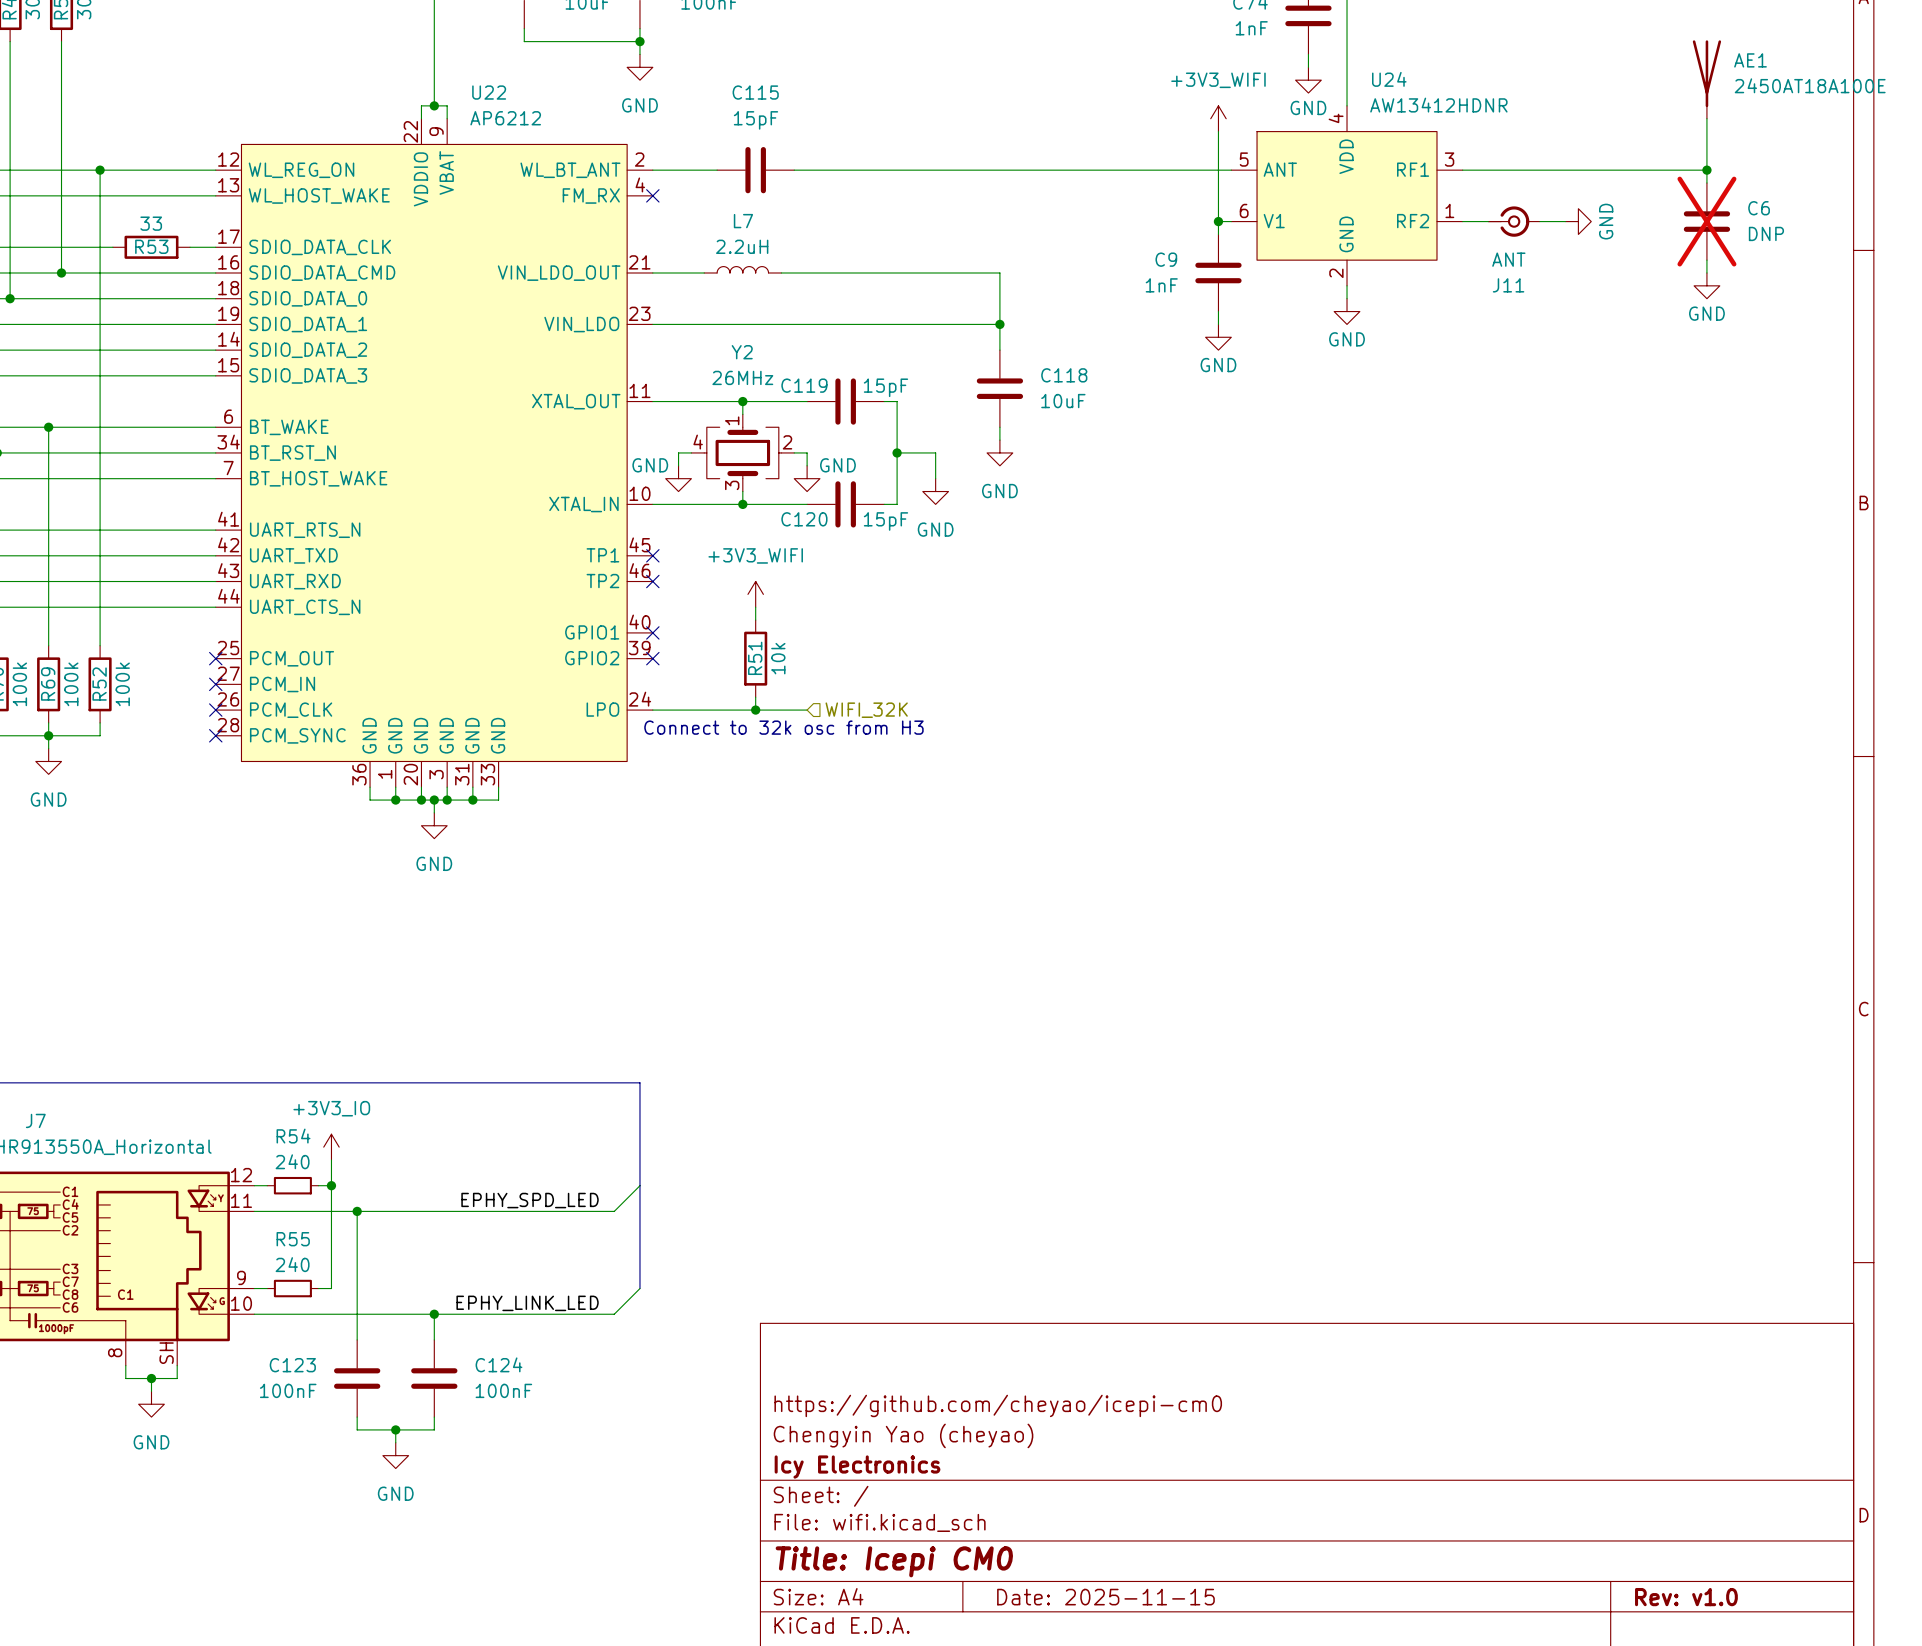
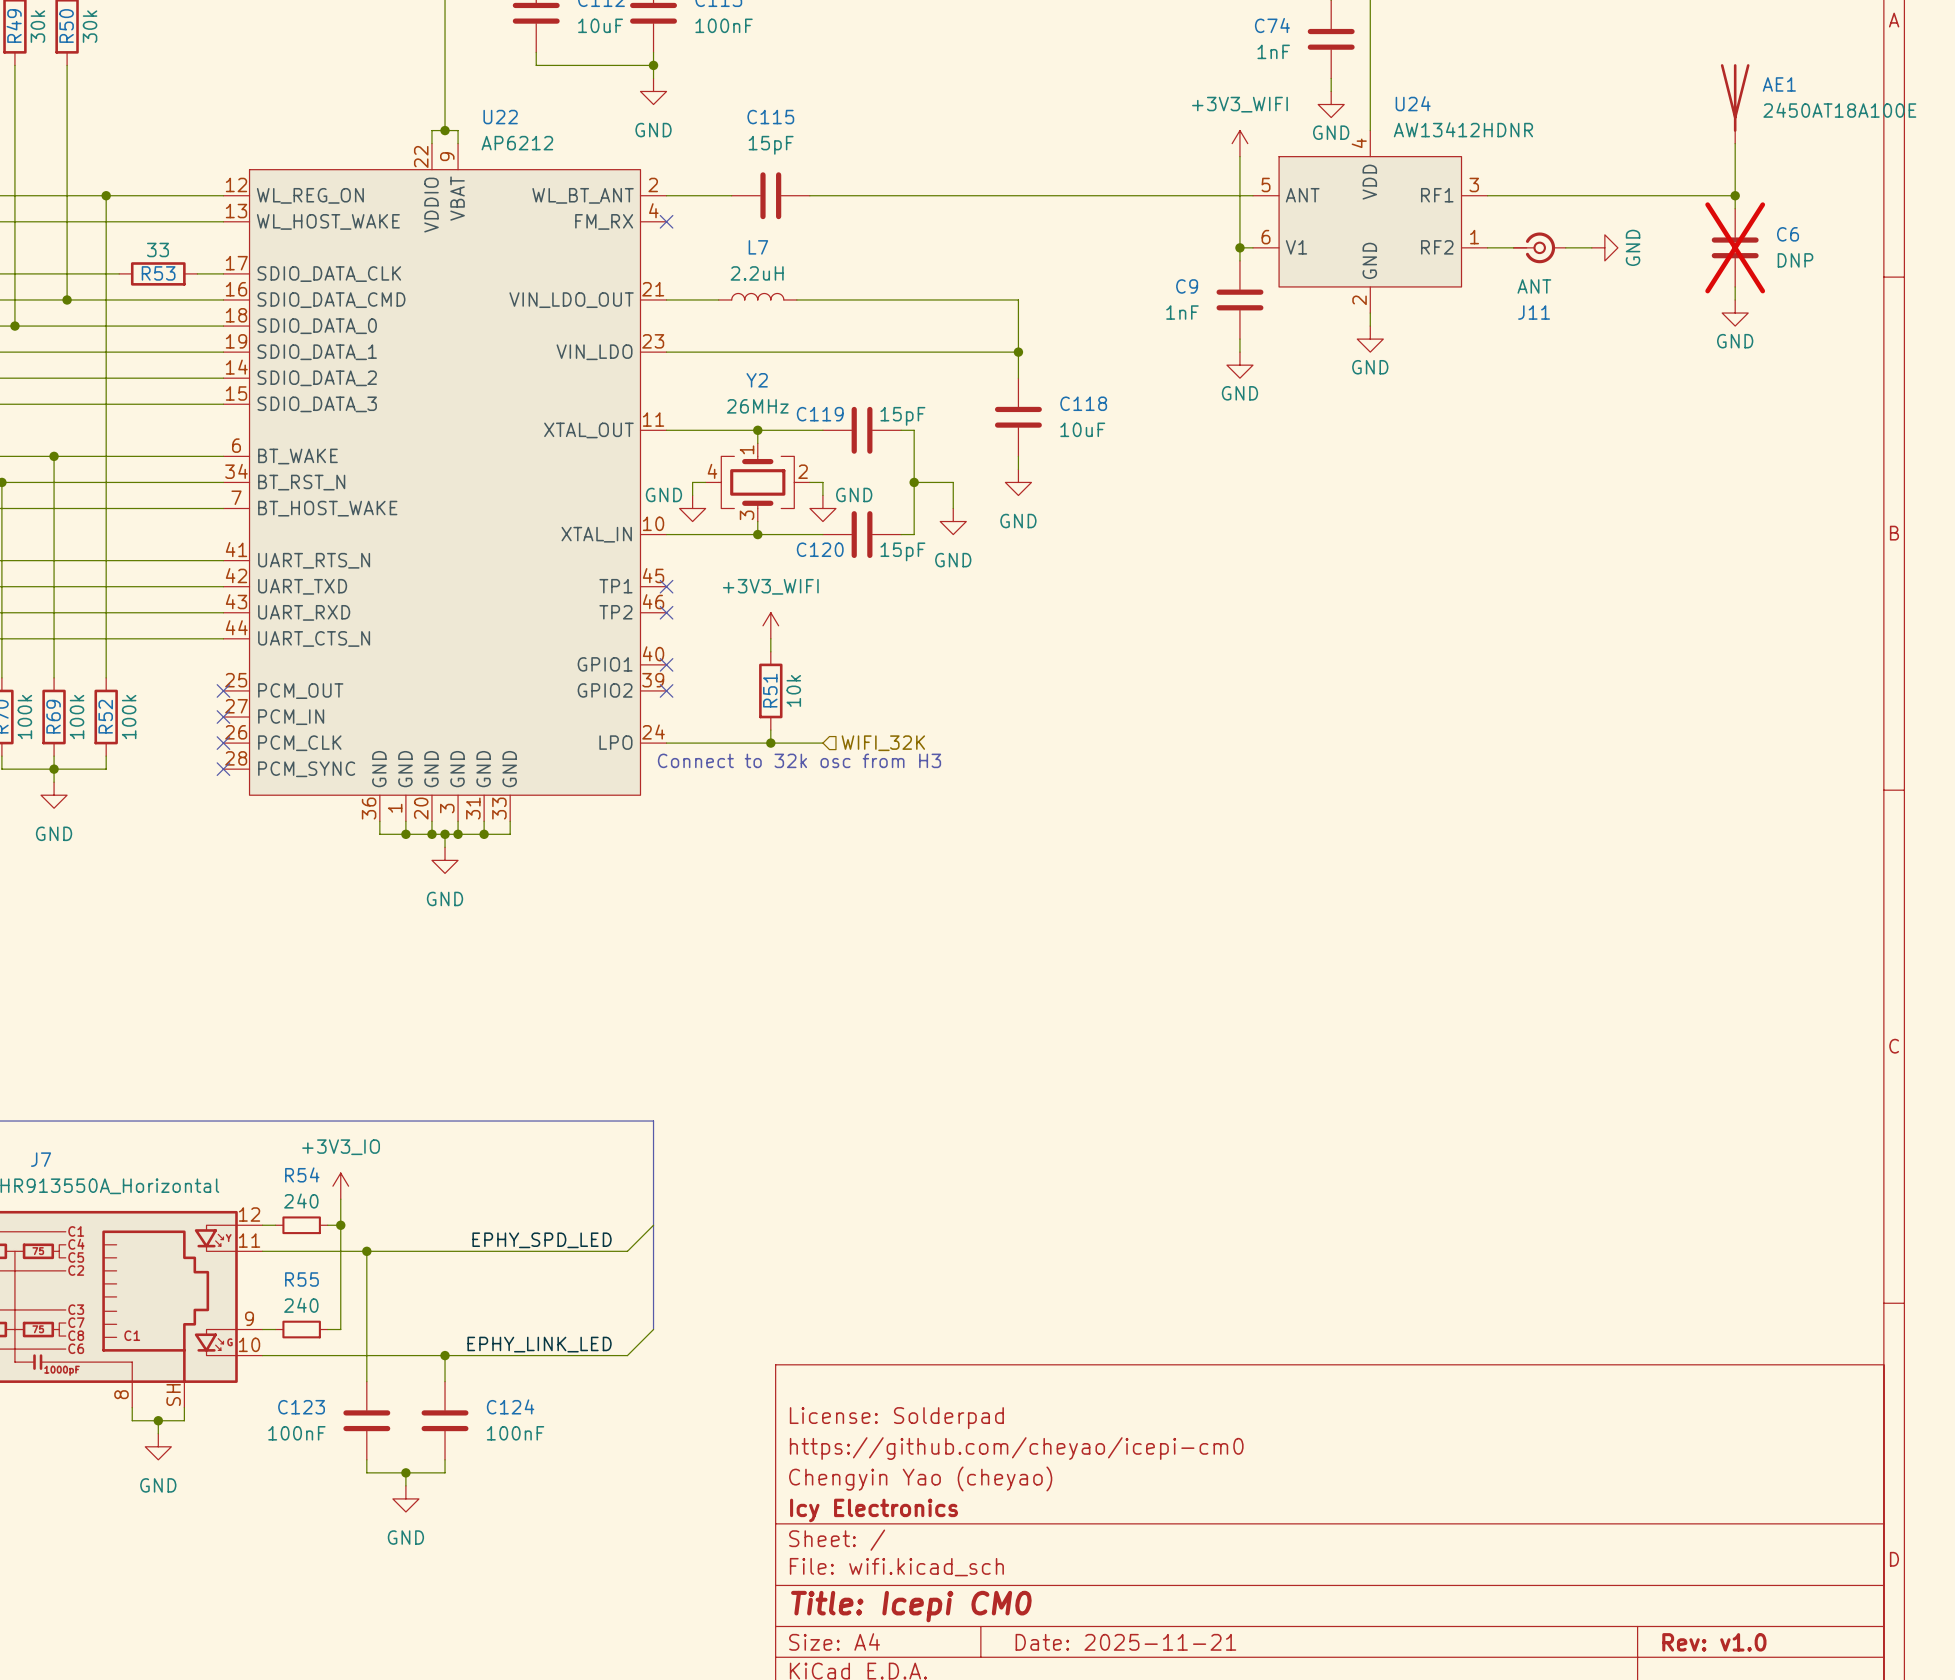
title block: none -> License: Solderpad (896, 1418)
title block: Date: 2025-11-15 (1105, 1597) -> Date: 2025-11-21 (1125, 1642)

